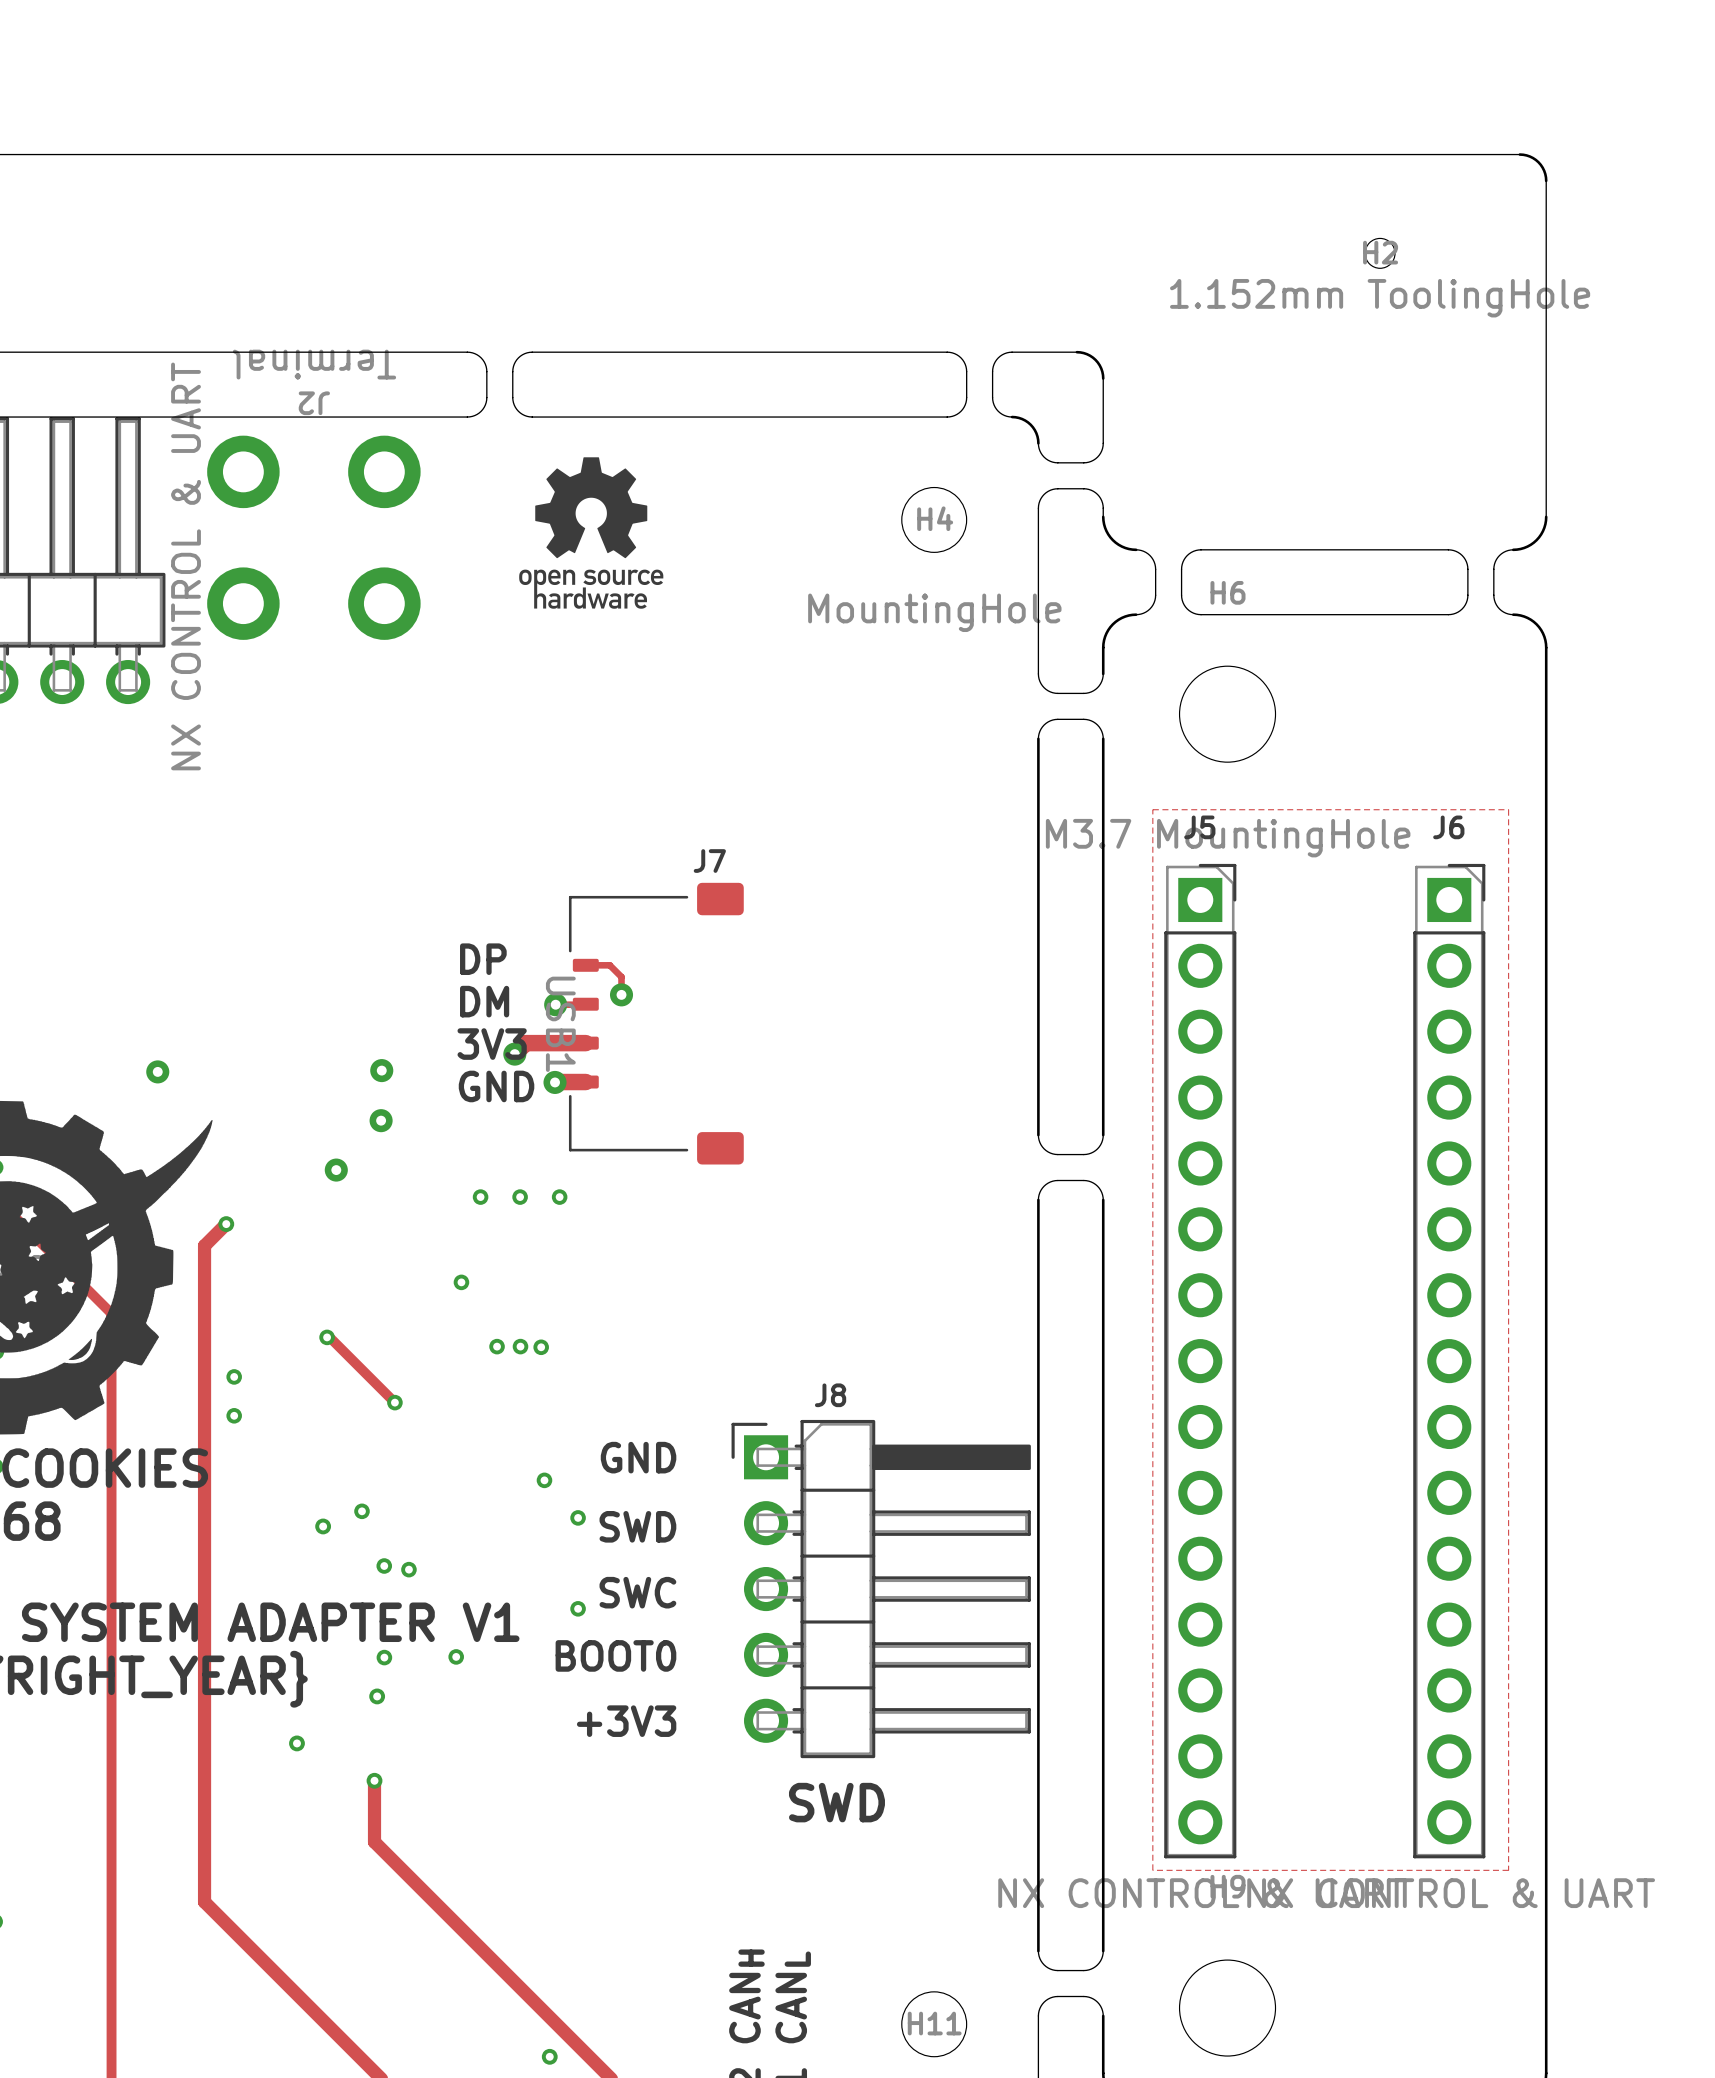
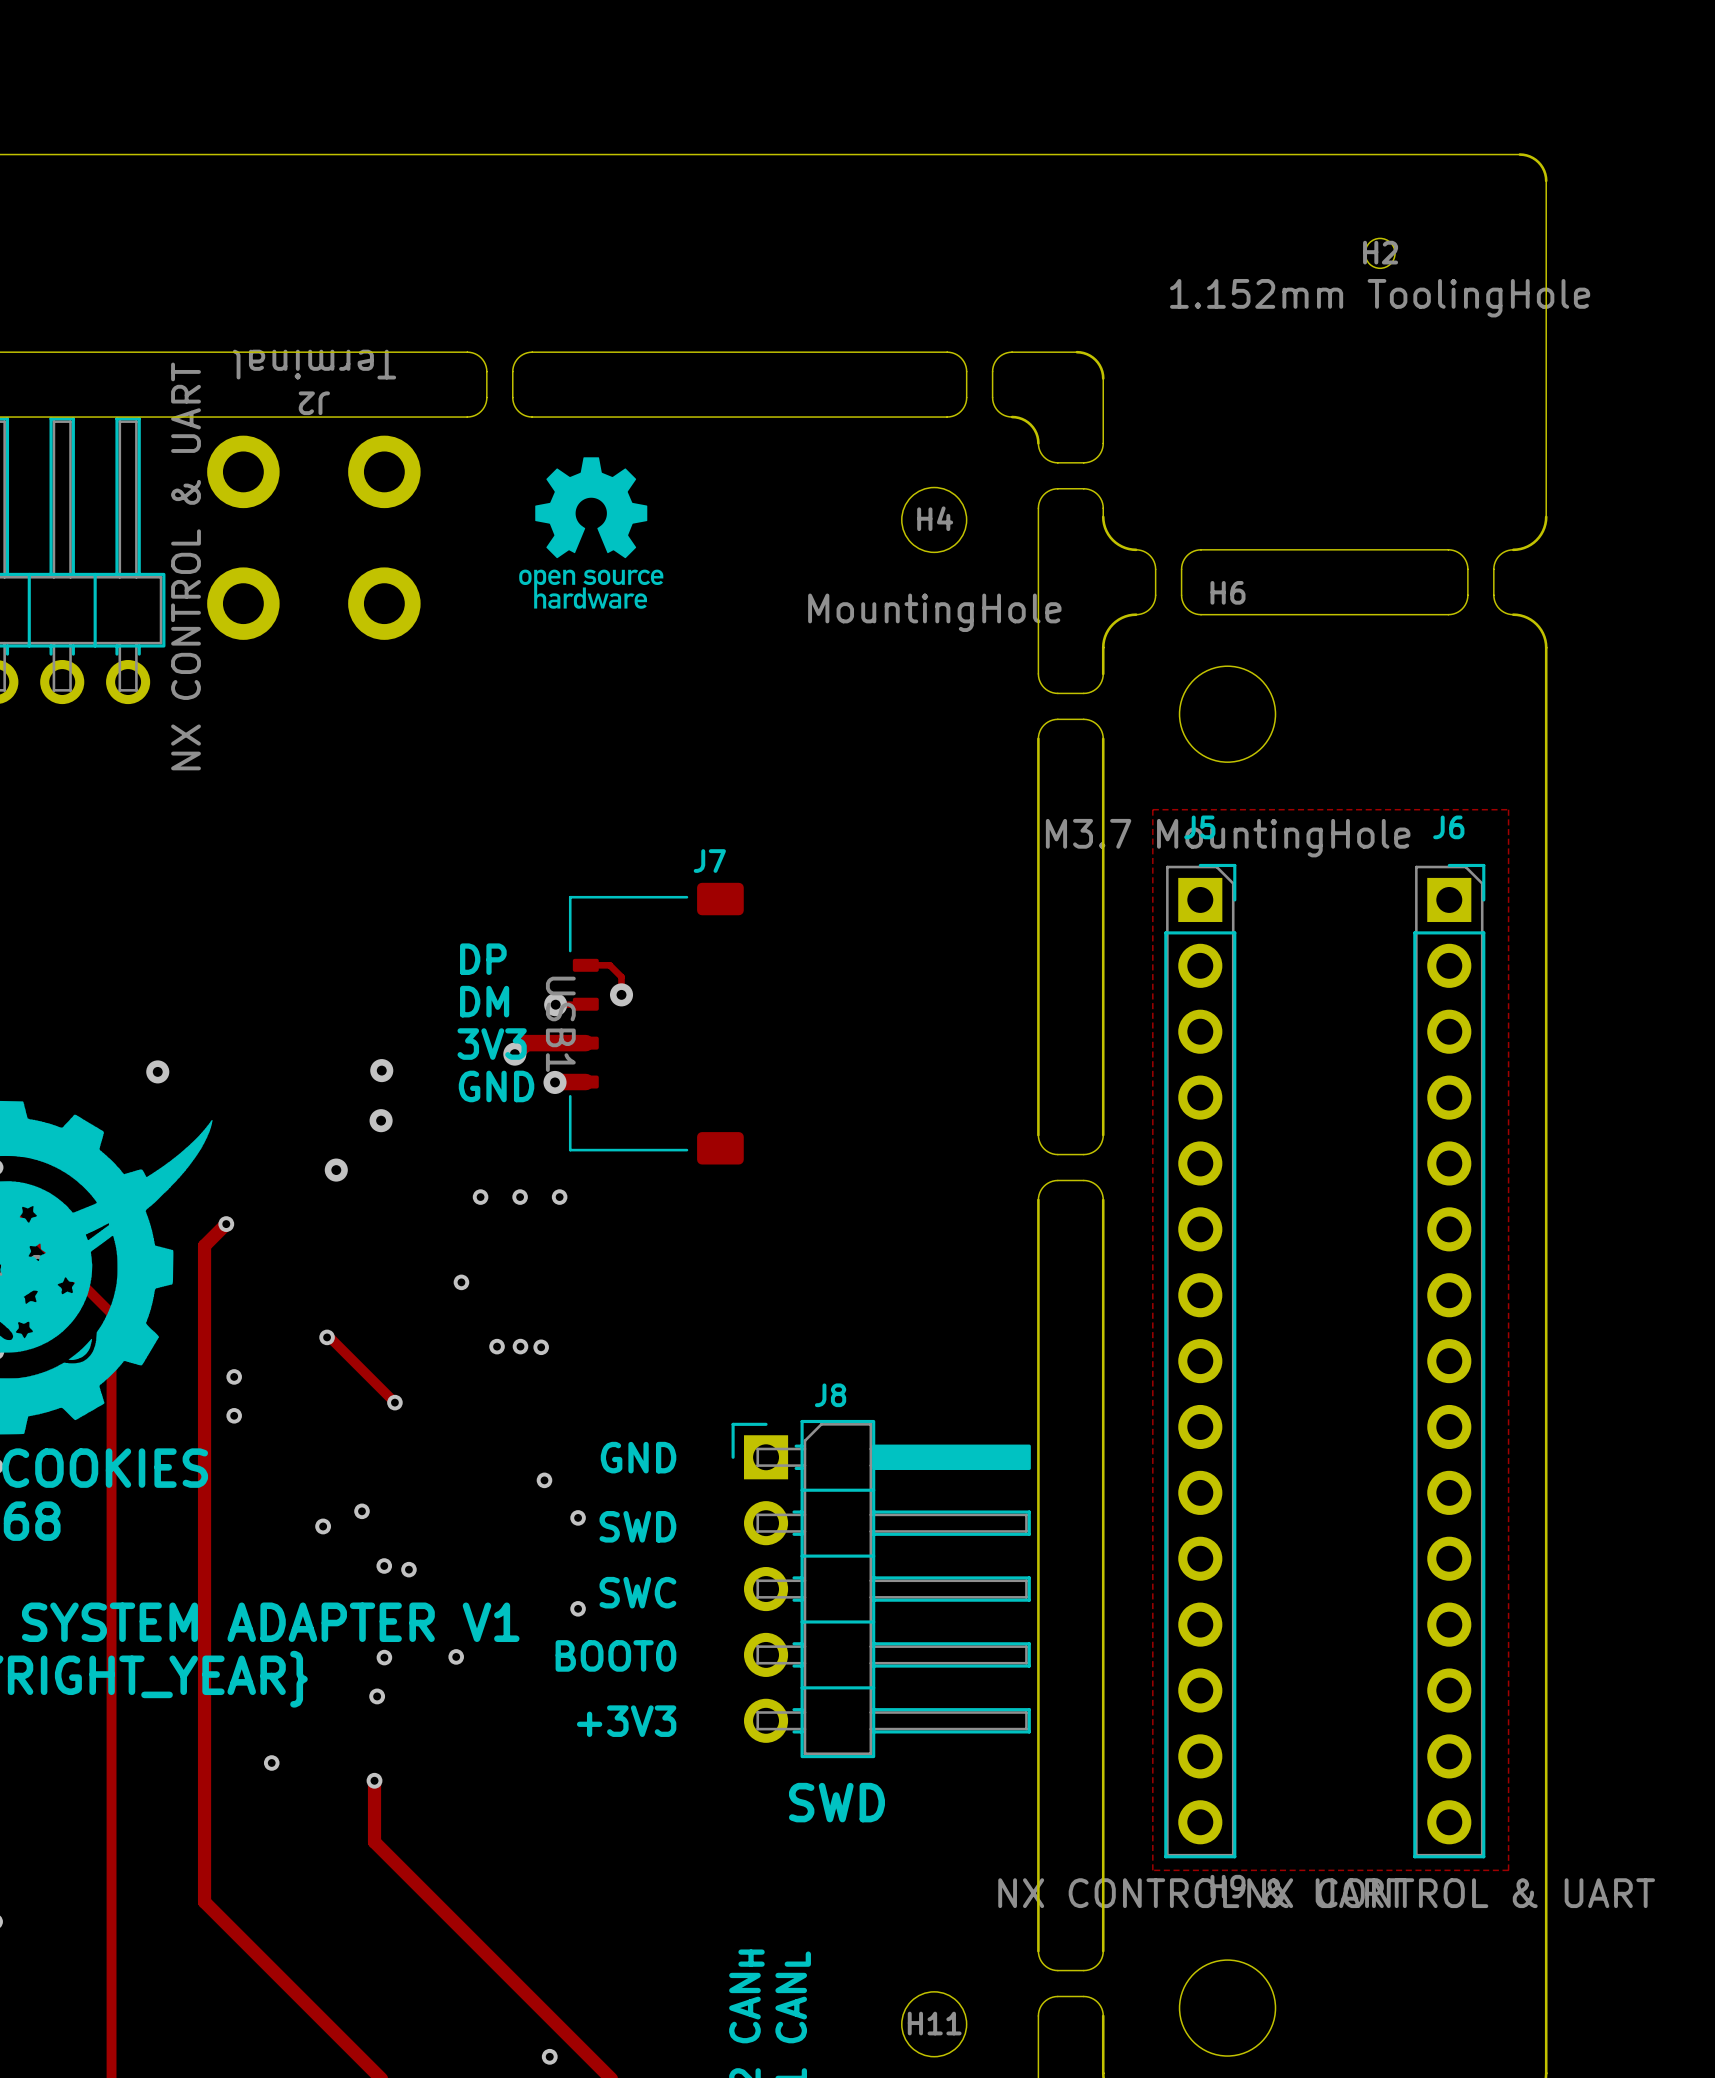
via position: (296, 1743) -> (271, 1762)

